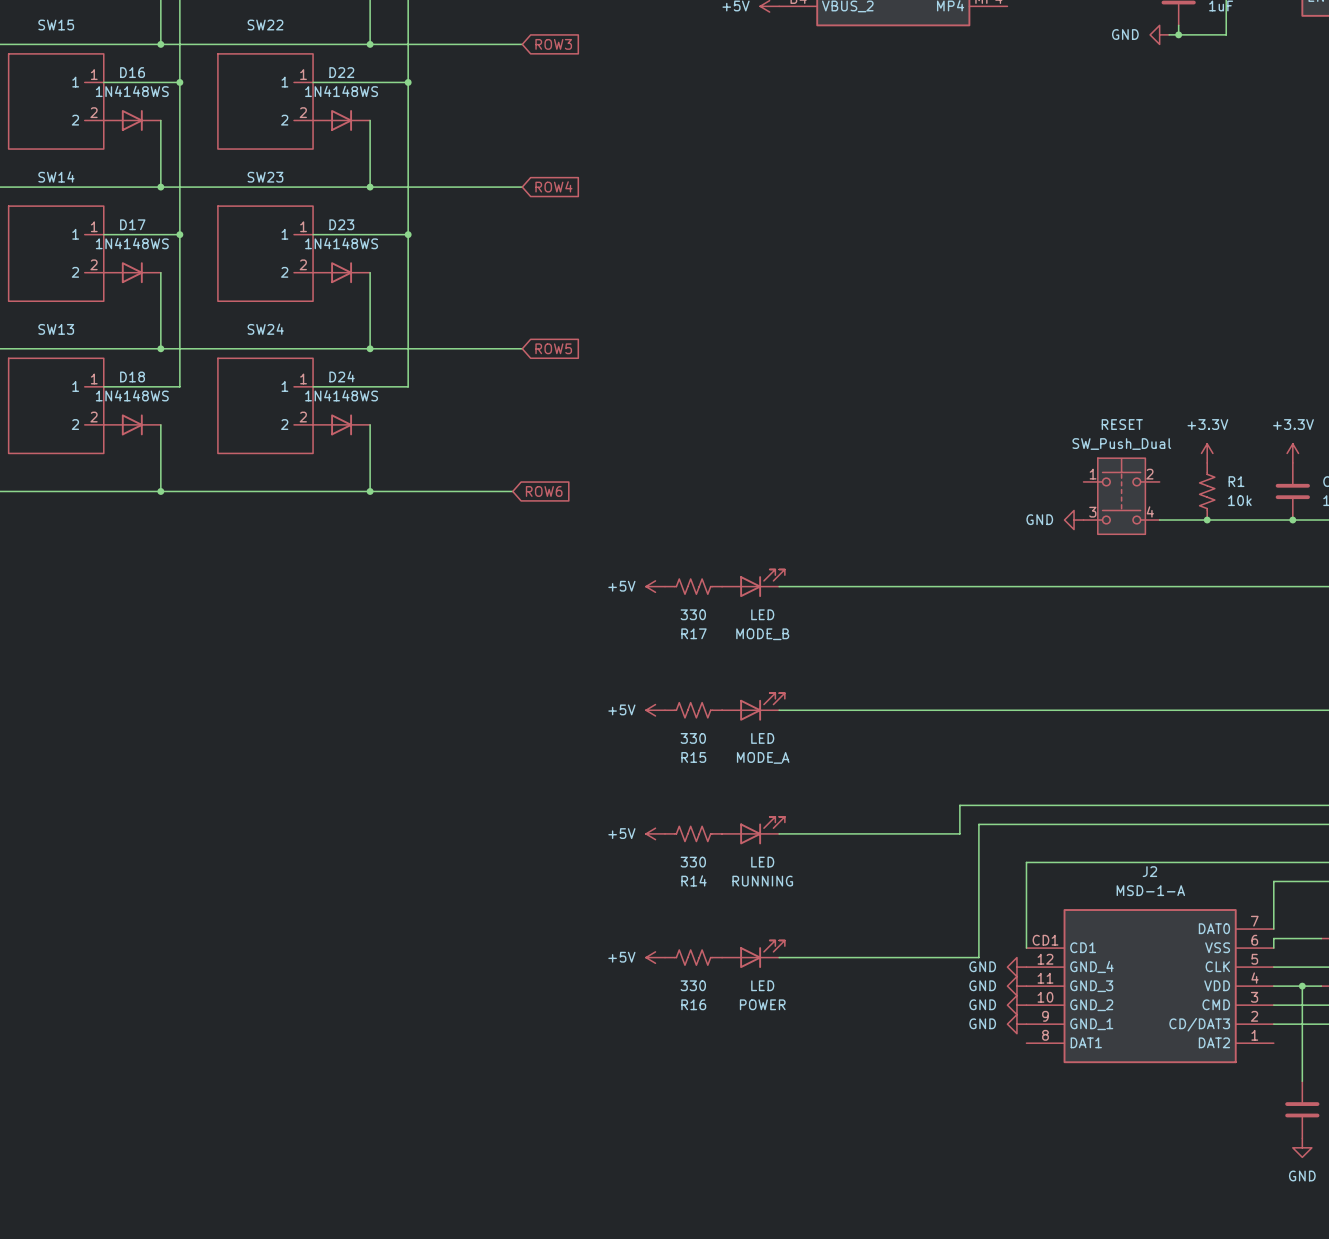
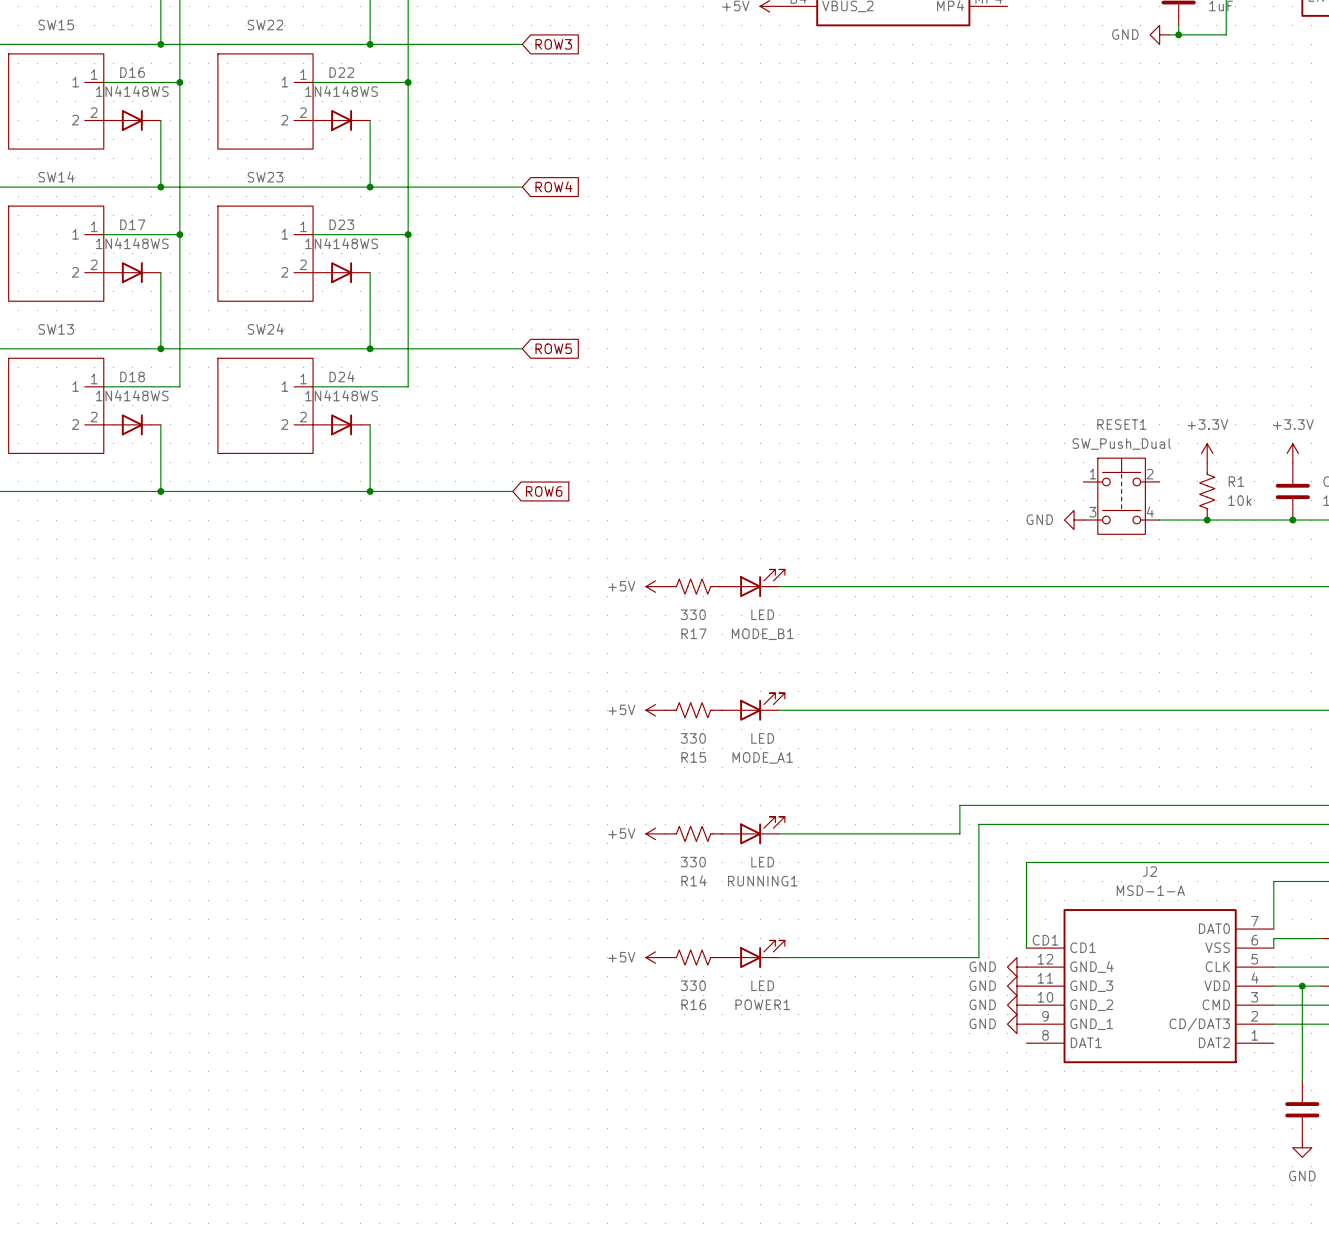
RESET name: RESET (1122, 424) -> RESET1 (1121, 424)
MODE_B name: MODE_B (762, 634) -> MODE_B1 (762, 634)
MODE_A name: MODE_A (763, 757) -> MODE_A1 (762, 757)
RUNNING name: RUNNING (762, 881) -> RUNNING1 (762, 881)
POWER name: POWER (762, 1004) -> POWER1 (762, 1004)

